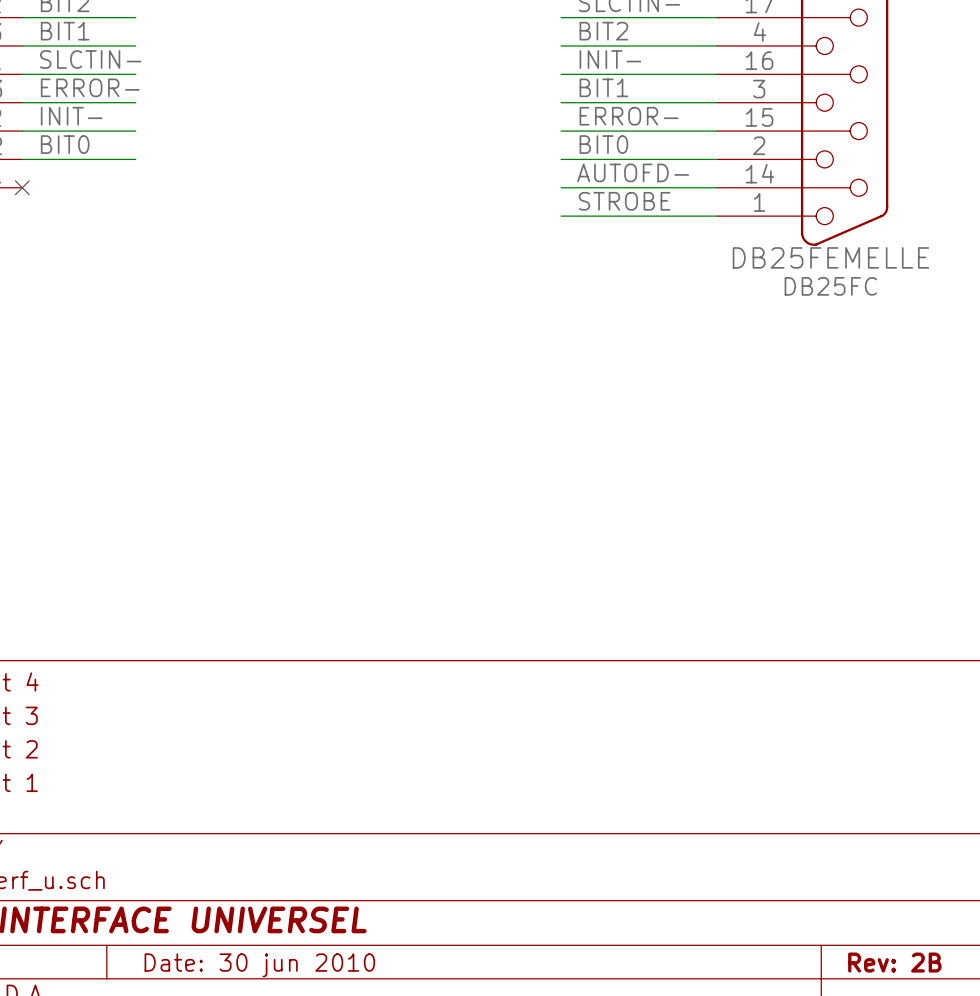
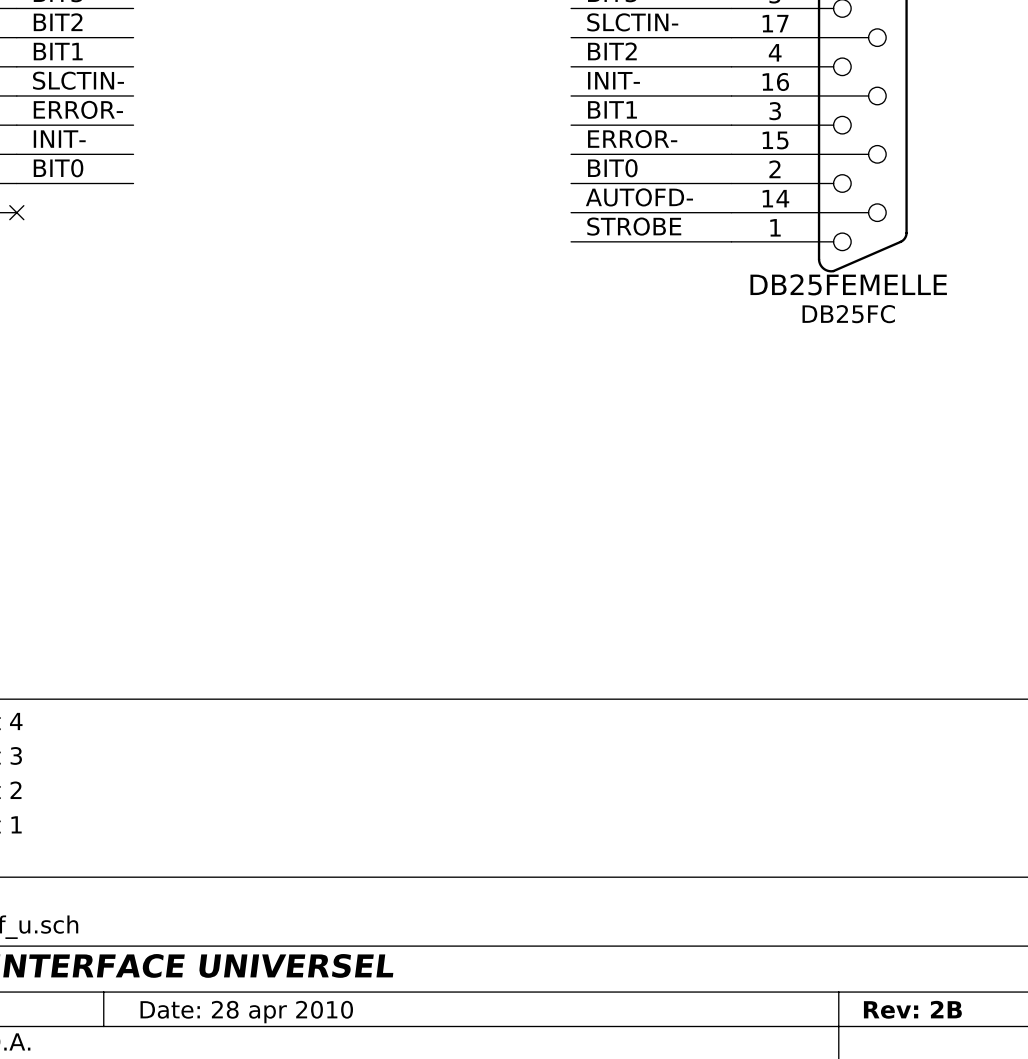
title block: Date: 30 jun 2010 (259, 965) -> Date: 28 apr 2010 (246, 1012)

